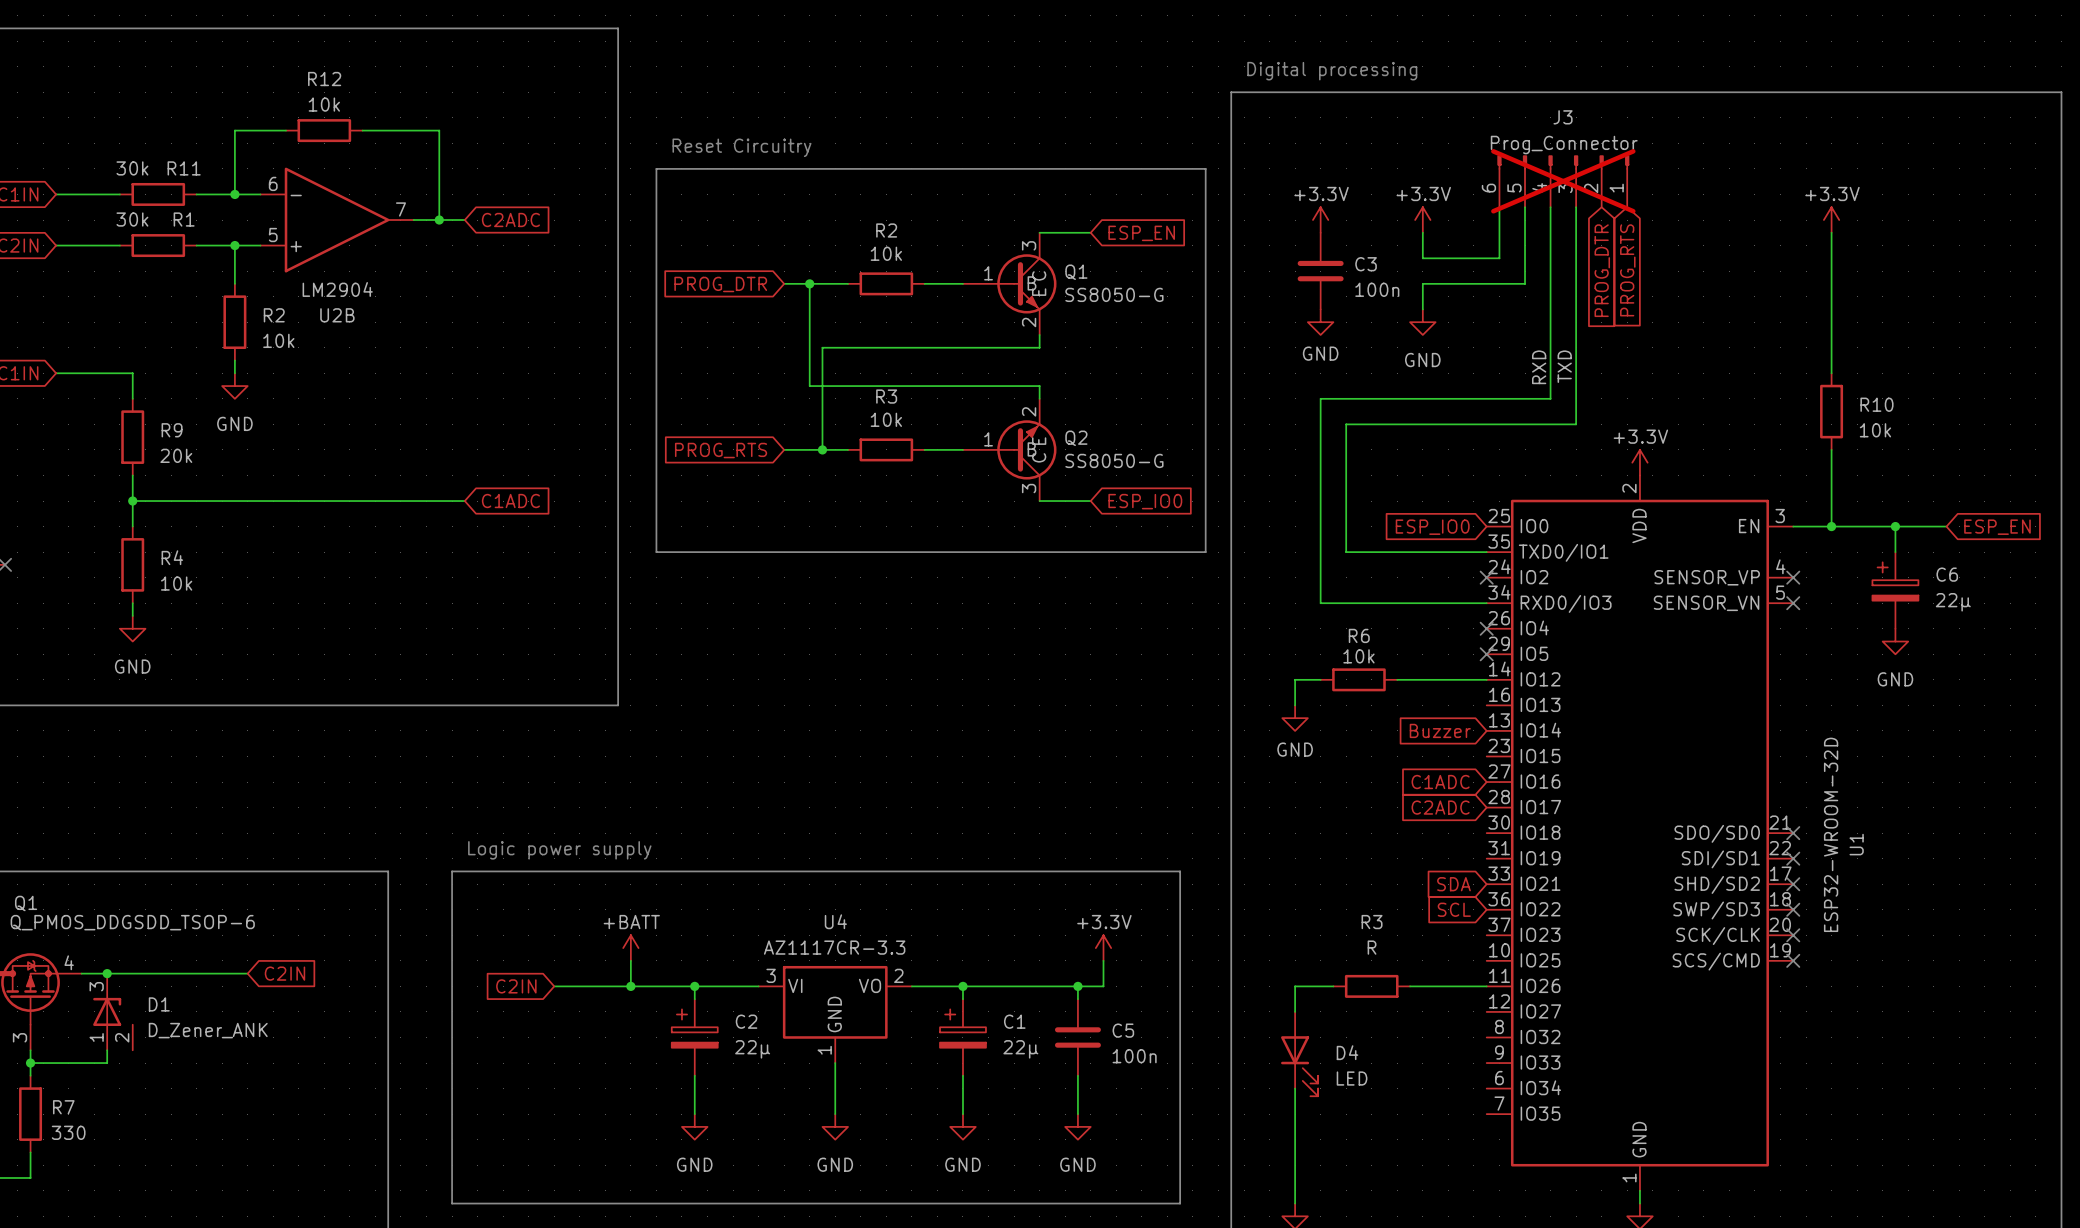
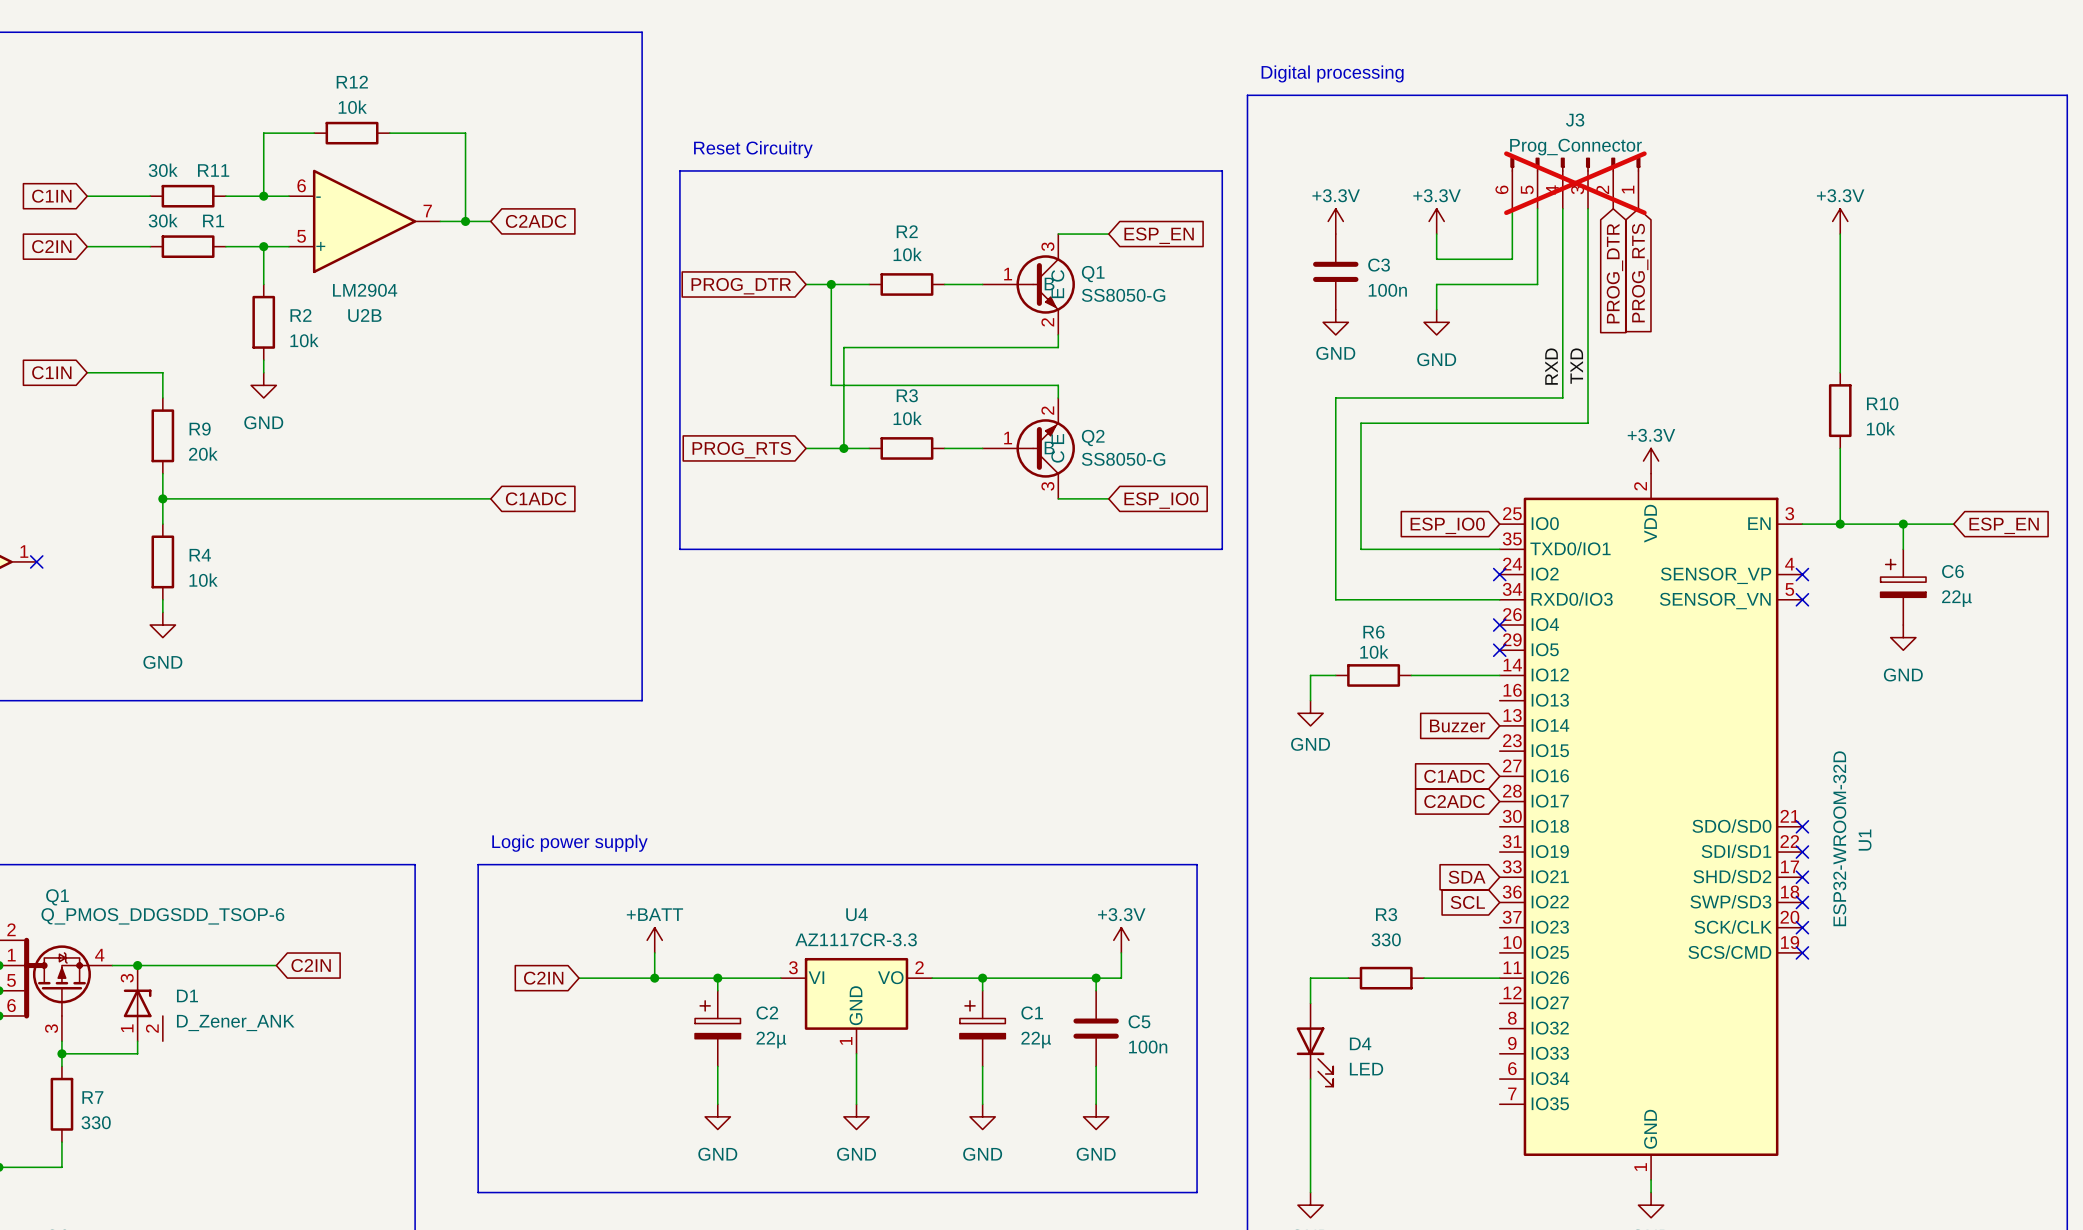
R3 value: R (1372, 947) -> 330 (1386, 939)

